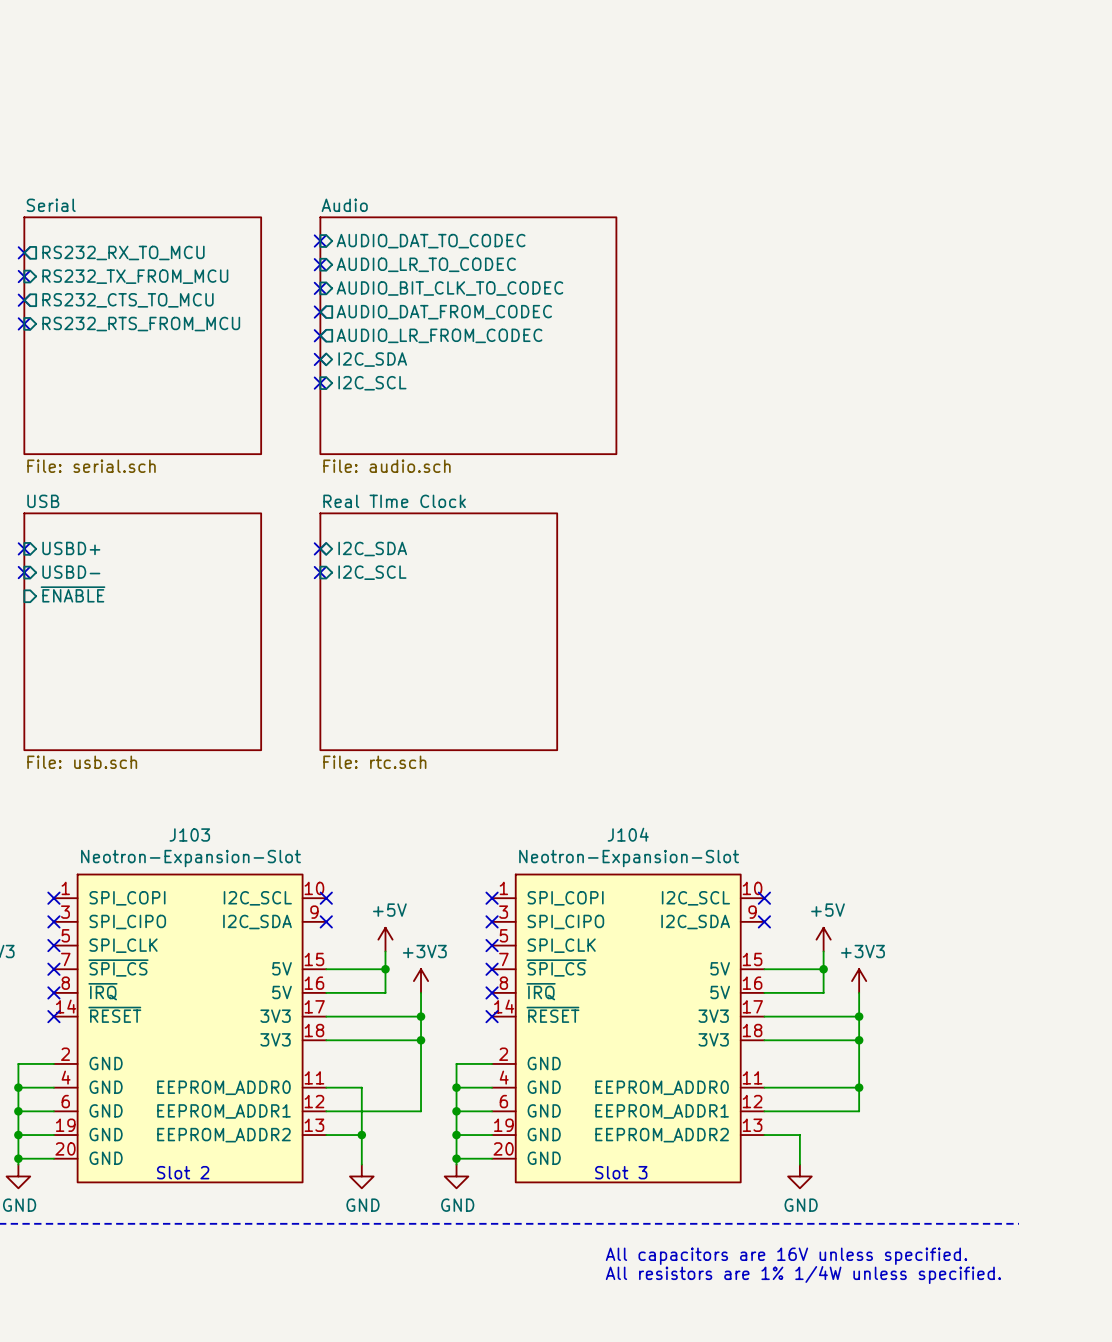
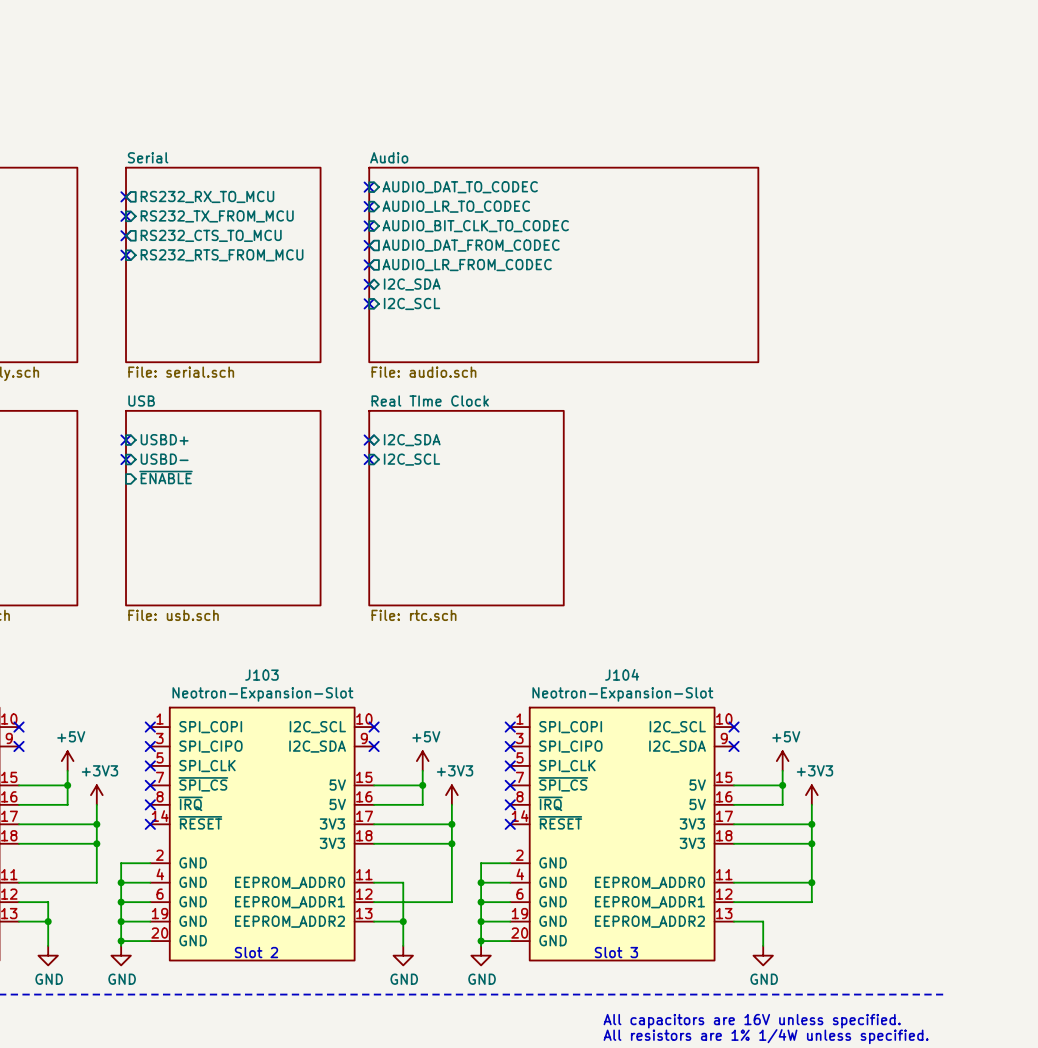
sheet Audio: File: audio.sch (468, 335) -> none
sheet Audio: none -> File: audio.sch (563, 264)

